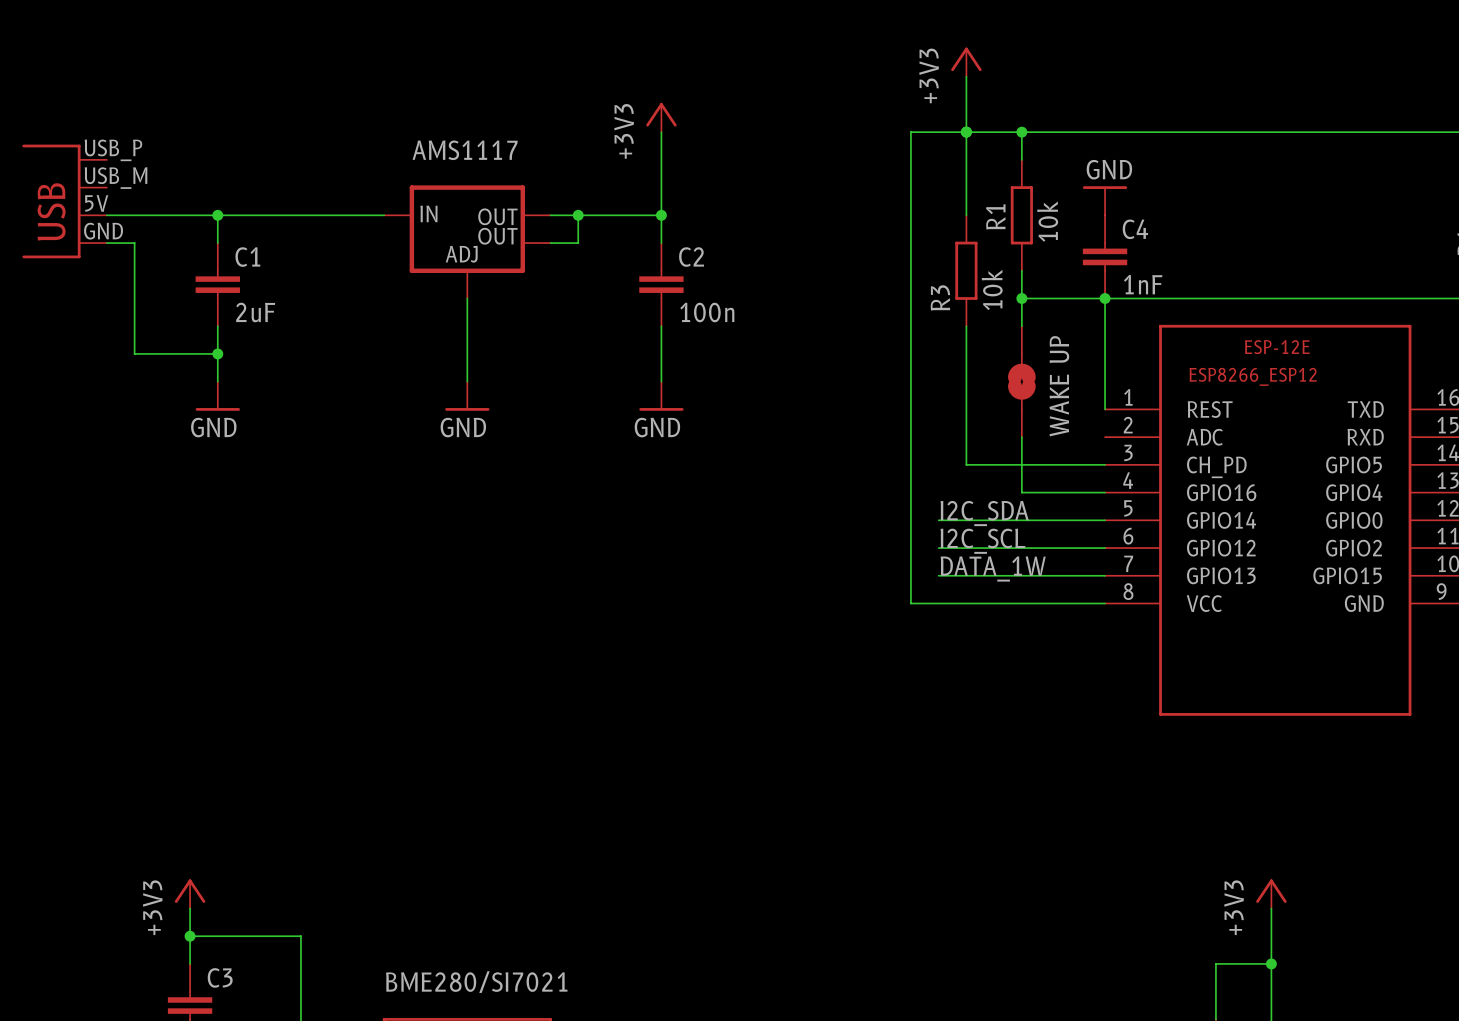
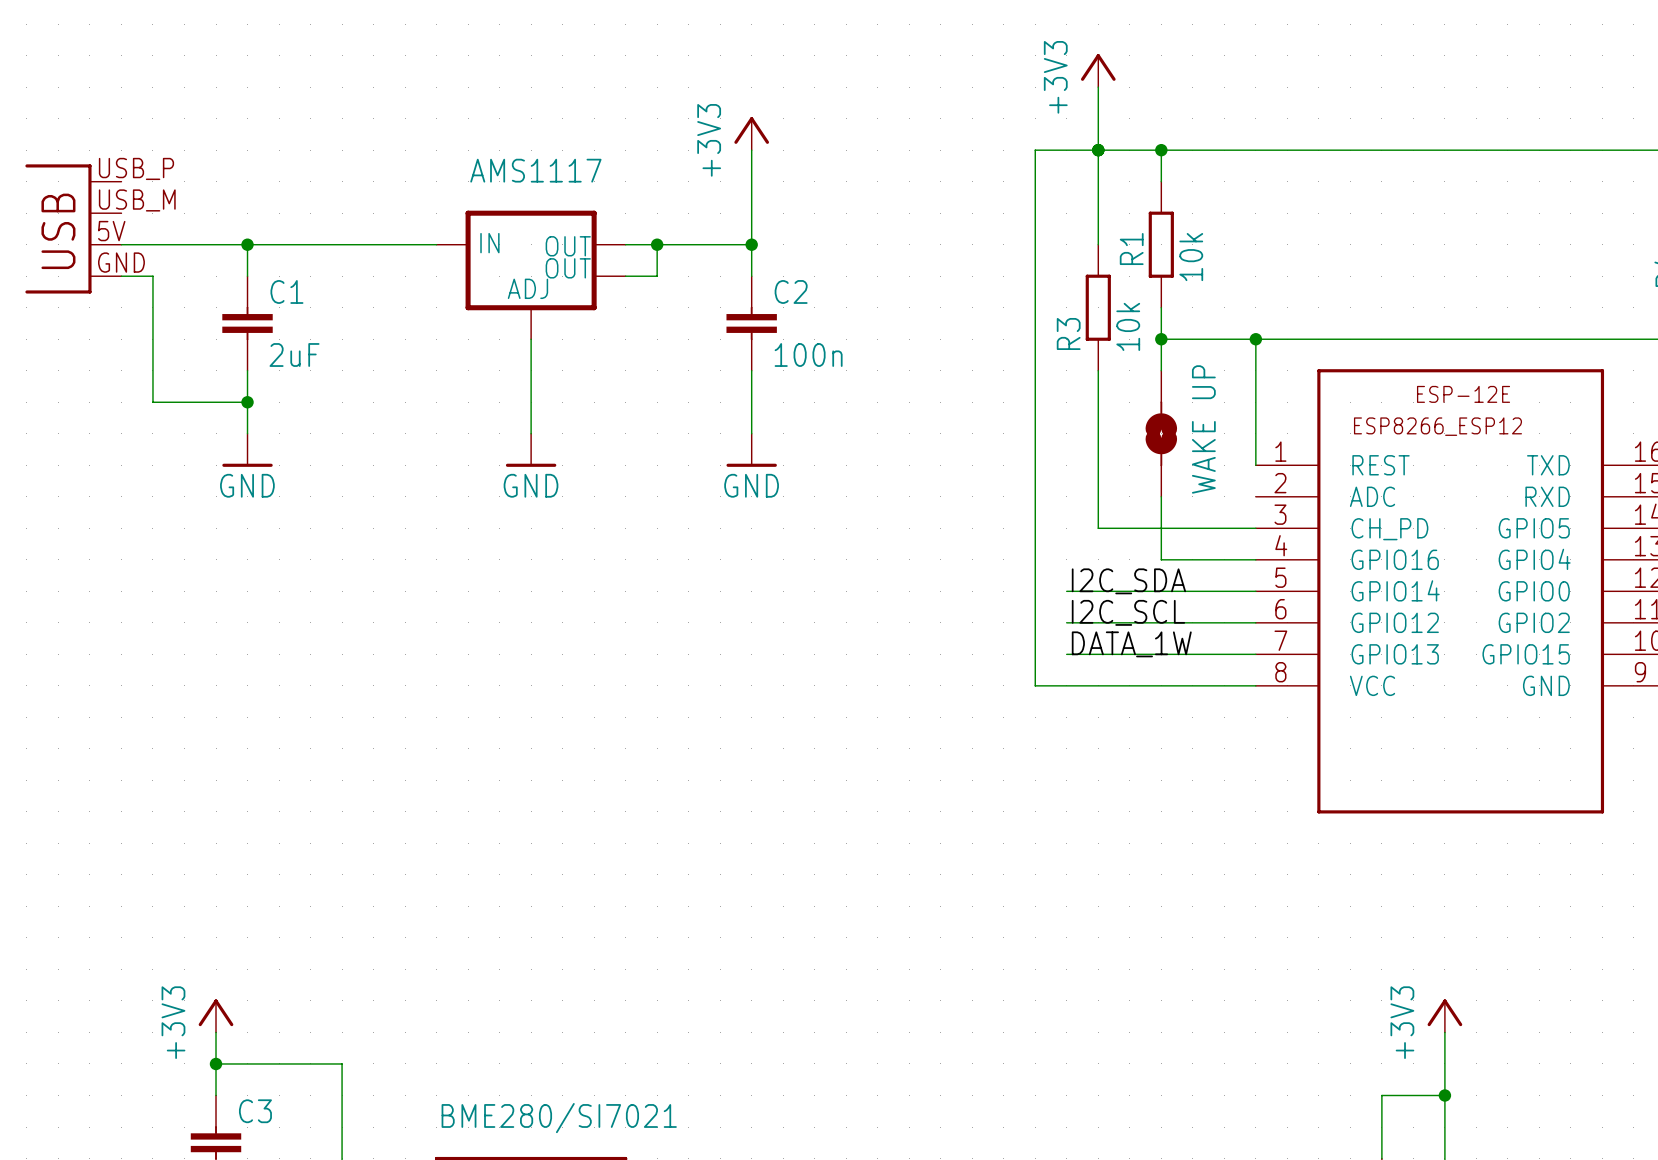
power symbol: GND (1105, 200) -> none
C4: 1nF (1105, 256) -> none

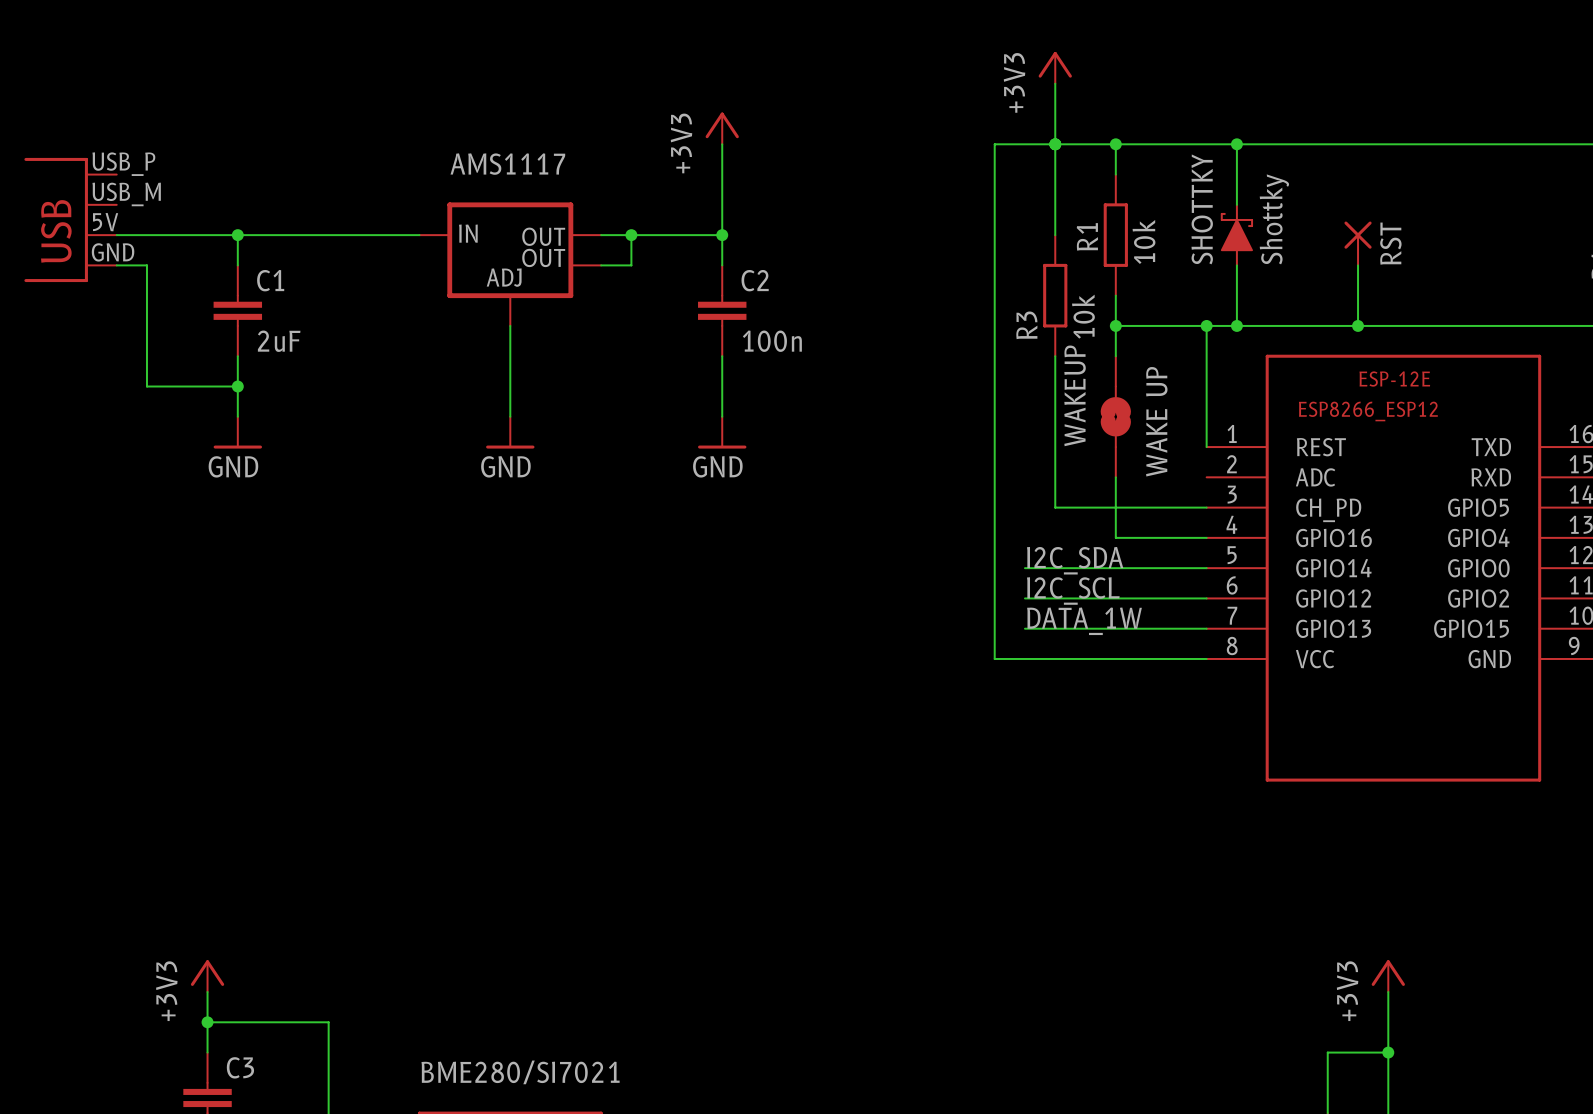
wire: none -> (1236, 144) (1236, 204)
junction: none -> (1236, 144)
SHOTTKY: none -> Shottky (1236, 235)
RST: none -> (1358, 243)
wire: none -> (1236, 265) (1236, 325)
wire: none -> (1358, 265) (1358, 325)
junction: none -> (1236, 325)
junction: none -> (1358, 325)
WAKEUP name: none -> WAKEUP (1075, 395)

